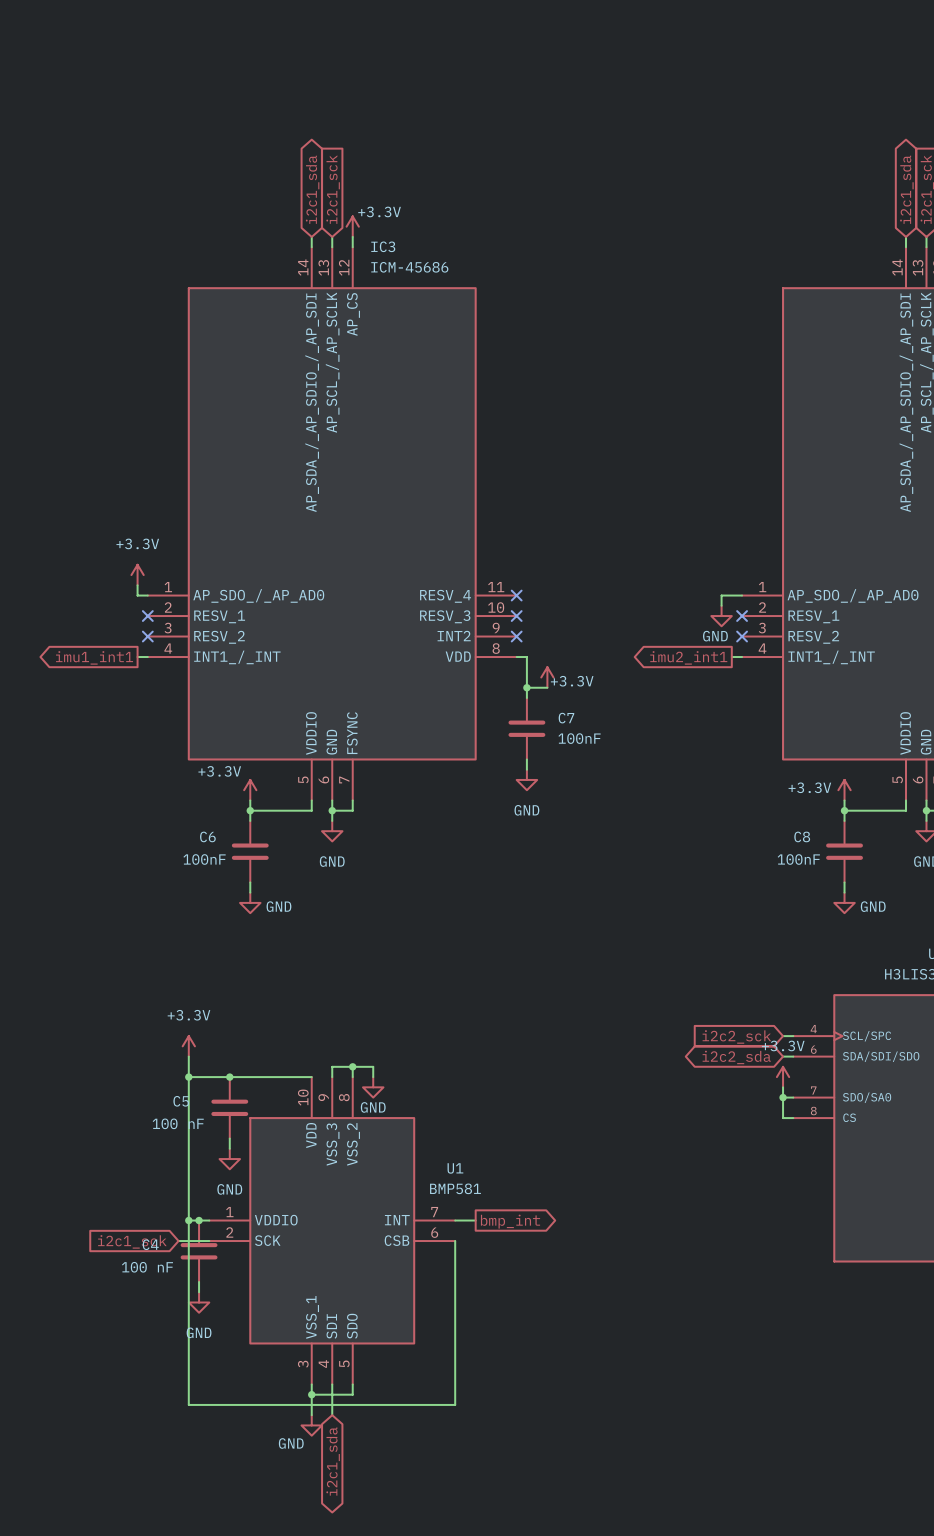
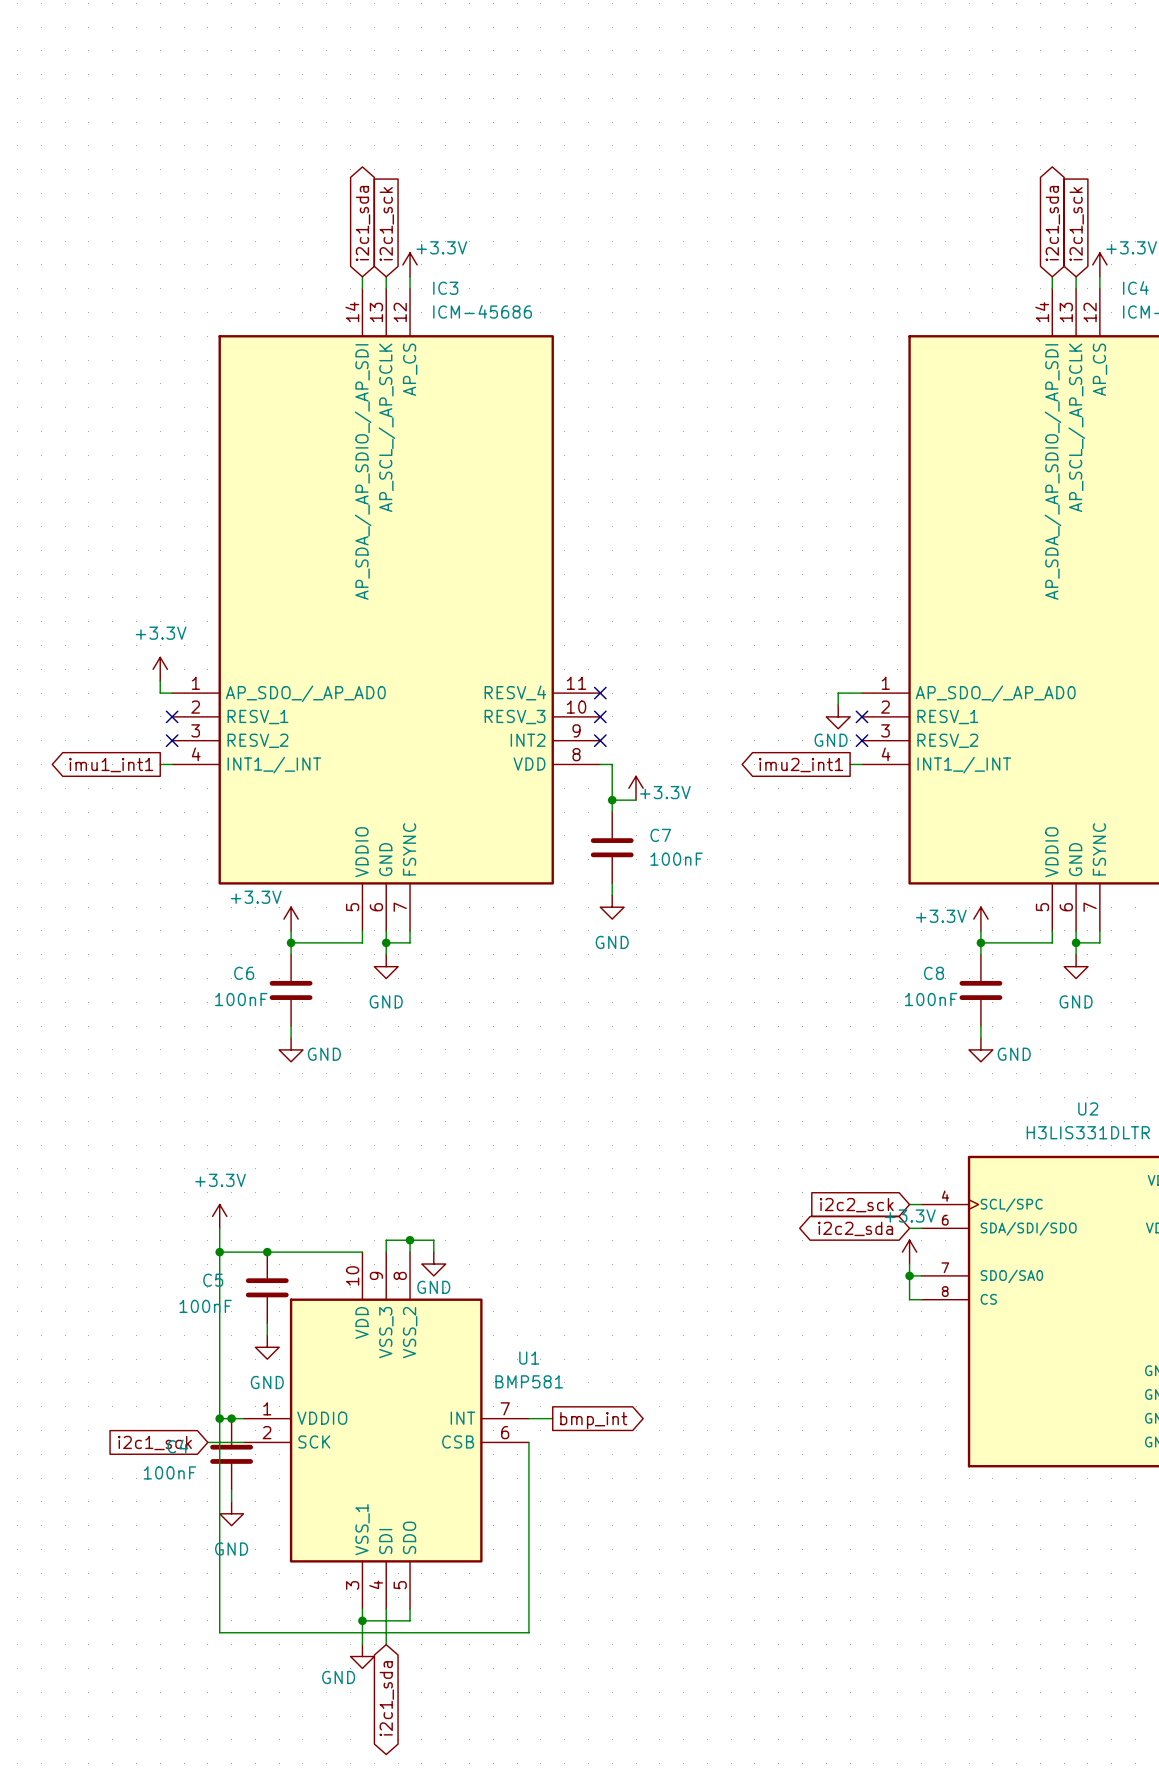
C5 value: 100 nF (178, 1123) -> 100nF (205, 1306)
C4 value: 100 nF (147, 1267) -> 100nF (169, 1472)

